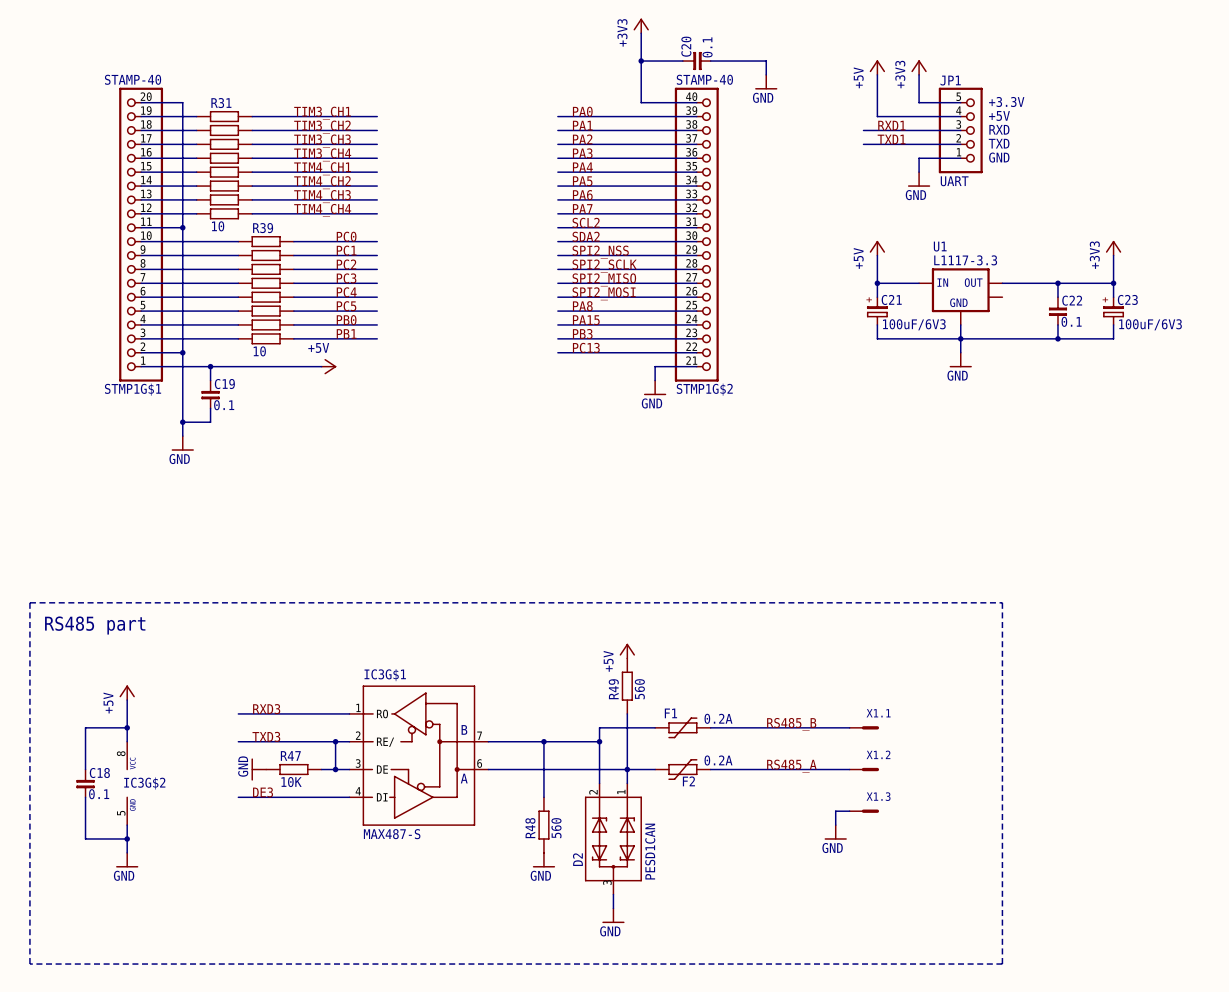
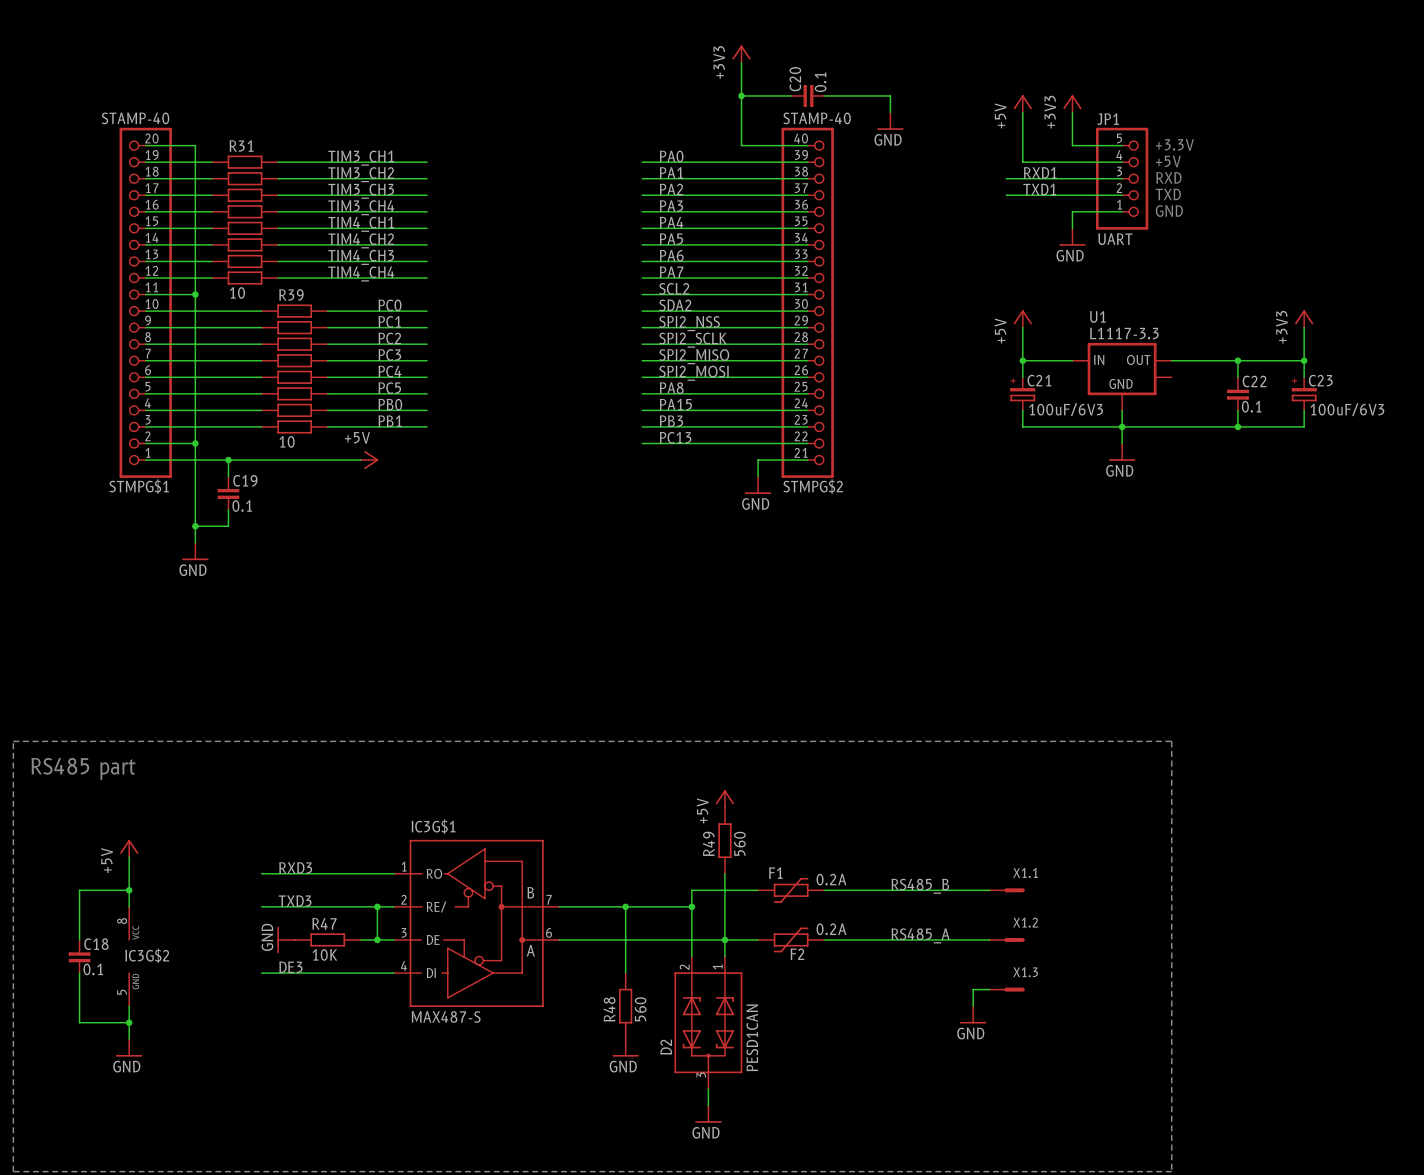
STMP1G$1 name: STMP1G$1 (133, 389) -> STMPG$1 (139, 486)
STMP1G$2 name: STMP1G$2 (704, 389) -> STMPG$2 (813, 486)

